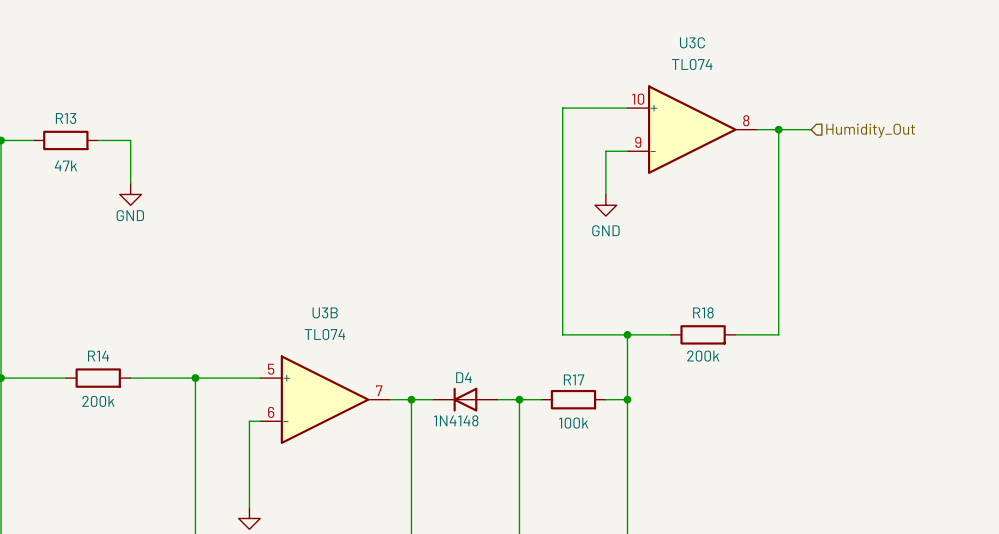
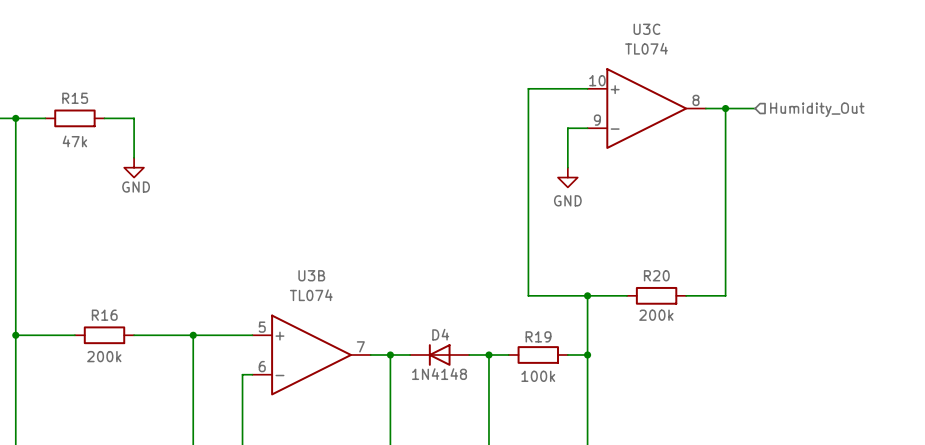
R13 name: R13 (66, 118) -> R15 (75, 98)
R18 name: R18 (703, 312) -> R20 (656, 275)
R14 name: R14 (98, 356) -> R16 (104, 315)
R17 name: R17 (574, 379) -> R19 (538, 336)

